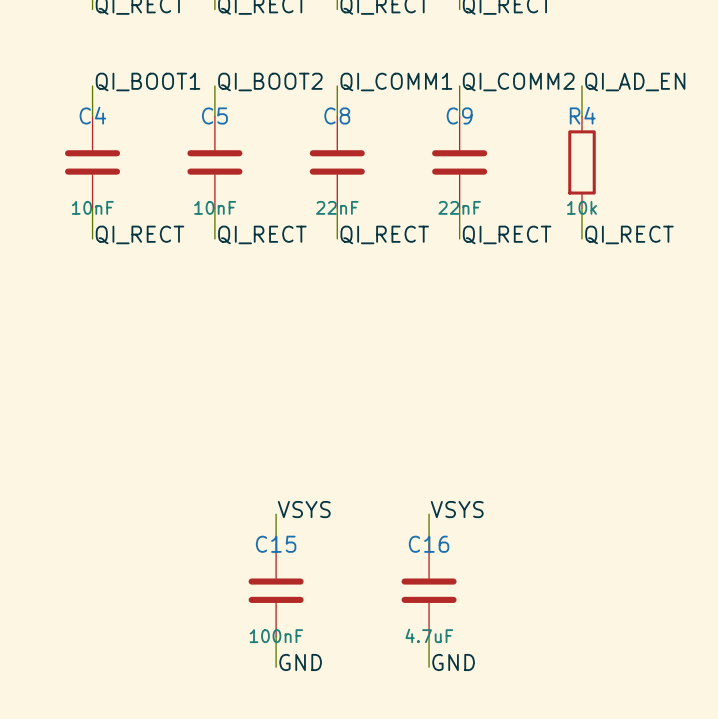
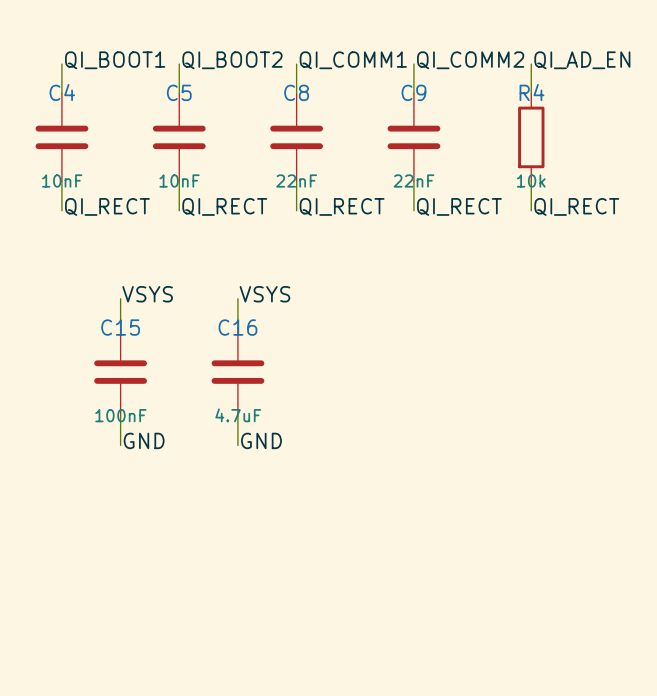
label: none -> VSYS (147, 294)
label: none -> VSYS (264, 294)
wire: none -> (120, 298) (120, 328)
label: none -> GND (144, 440)
label: none -> GND (261, 440)
label: VSYS (304, 509) -> none
label: VSYS (457, 509) -> none
wire: (276, 514) (276, 544) -> (237, 298) (237, 328)
wire: (429, 514) (429, 544) -> (120, 416) (120, 445)
C15 position: (276, 590) -> (120, 372)
C16 position: (429, 590) -> (237, 372)
wire: (276, 636) (276, 667) -> (237, 416) (237, 445)
wire: (429, 636) (429, 667) -> none
label: GND (300, 662) -> none
label: GND (453, 662) -> none

